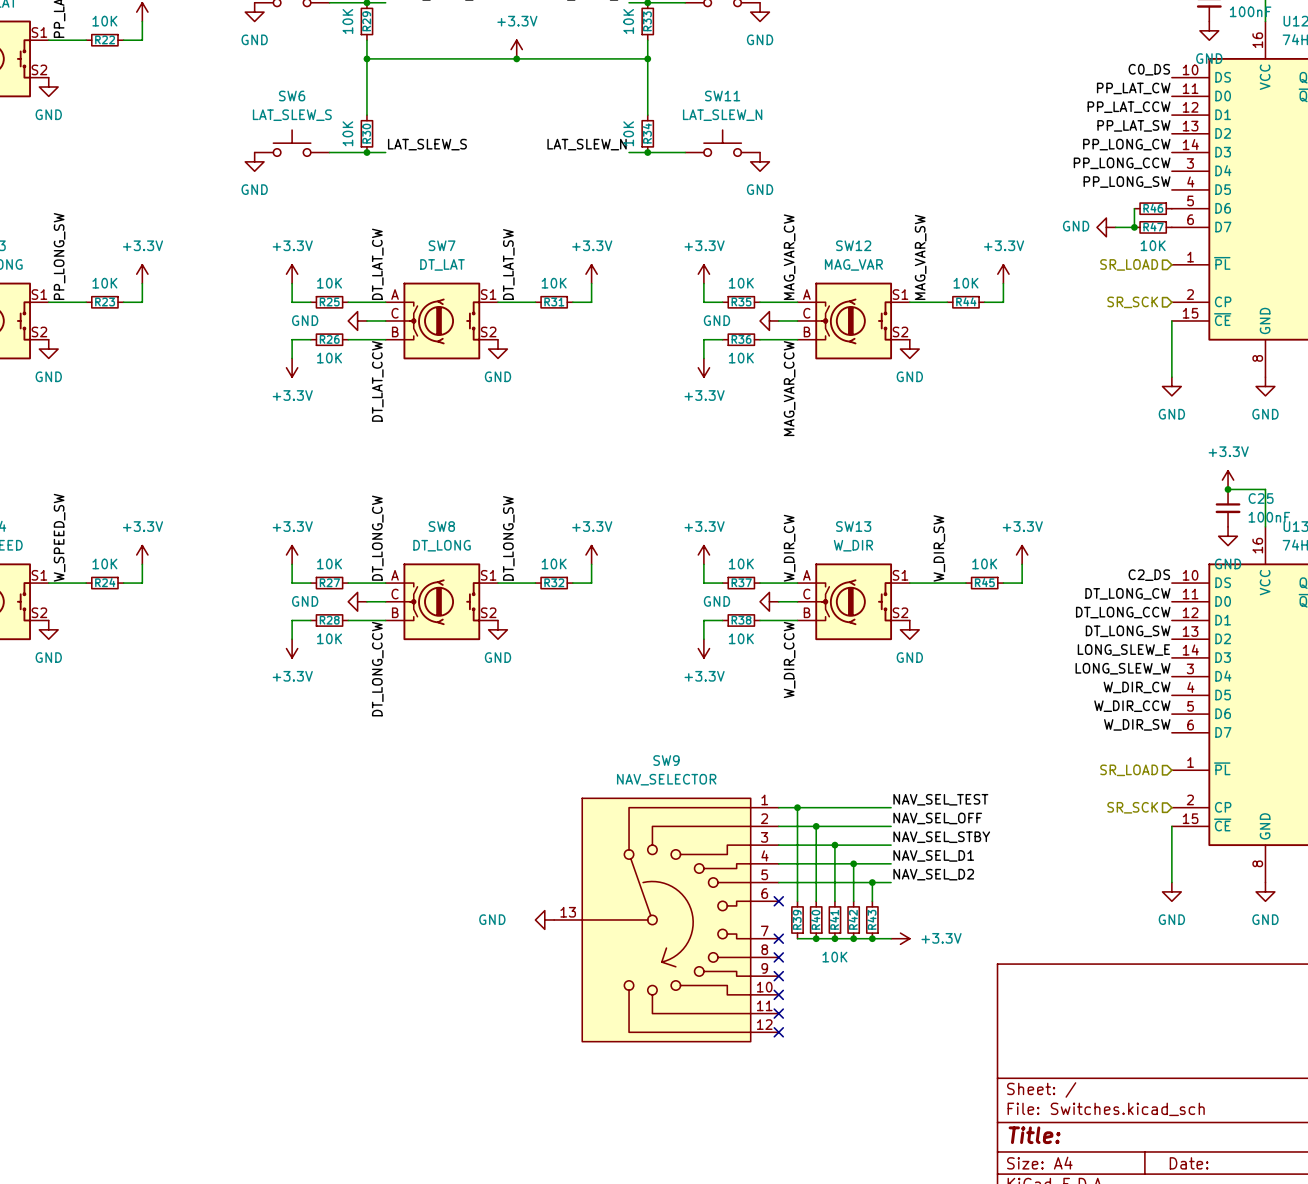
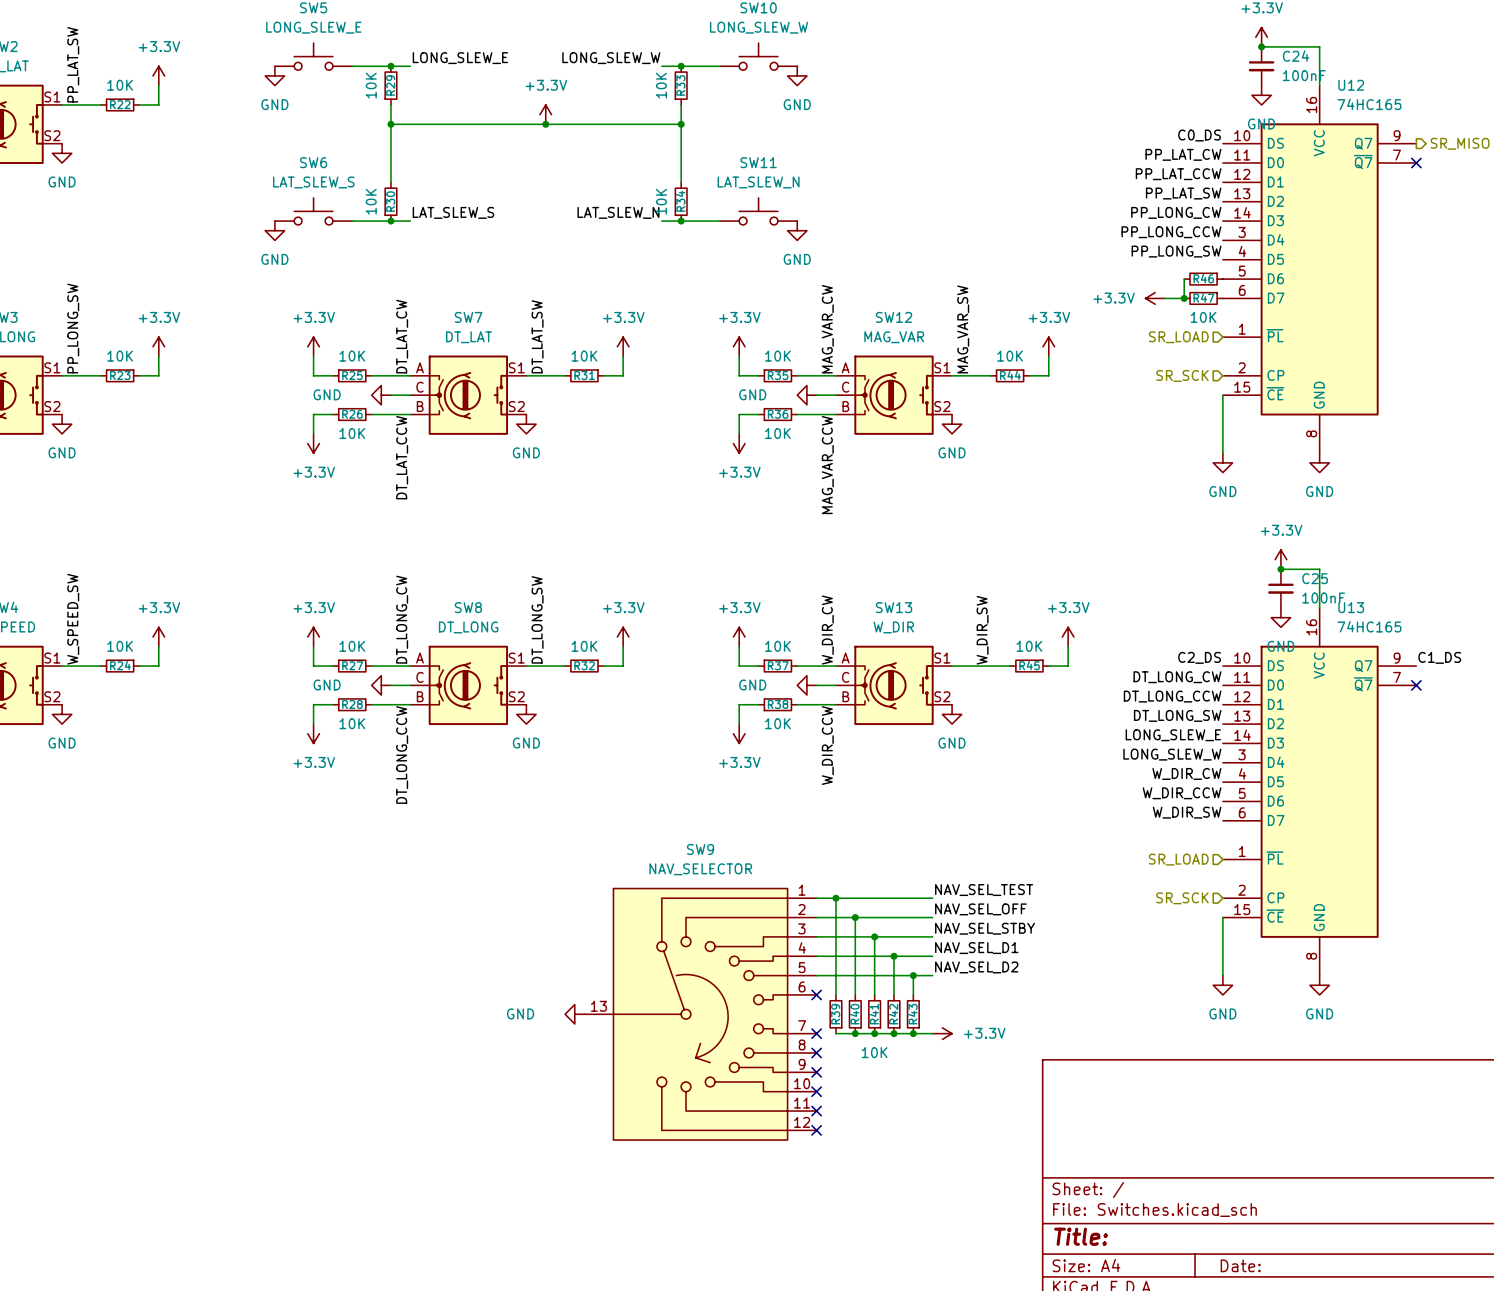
power symbol: GND (1106, 227) -> +3.3V (1155, 298)

